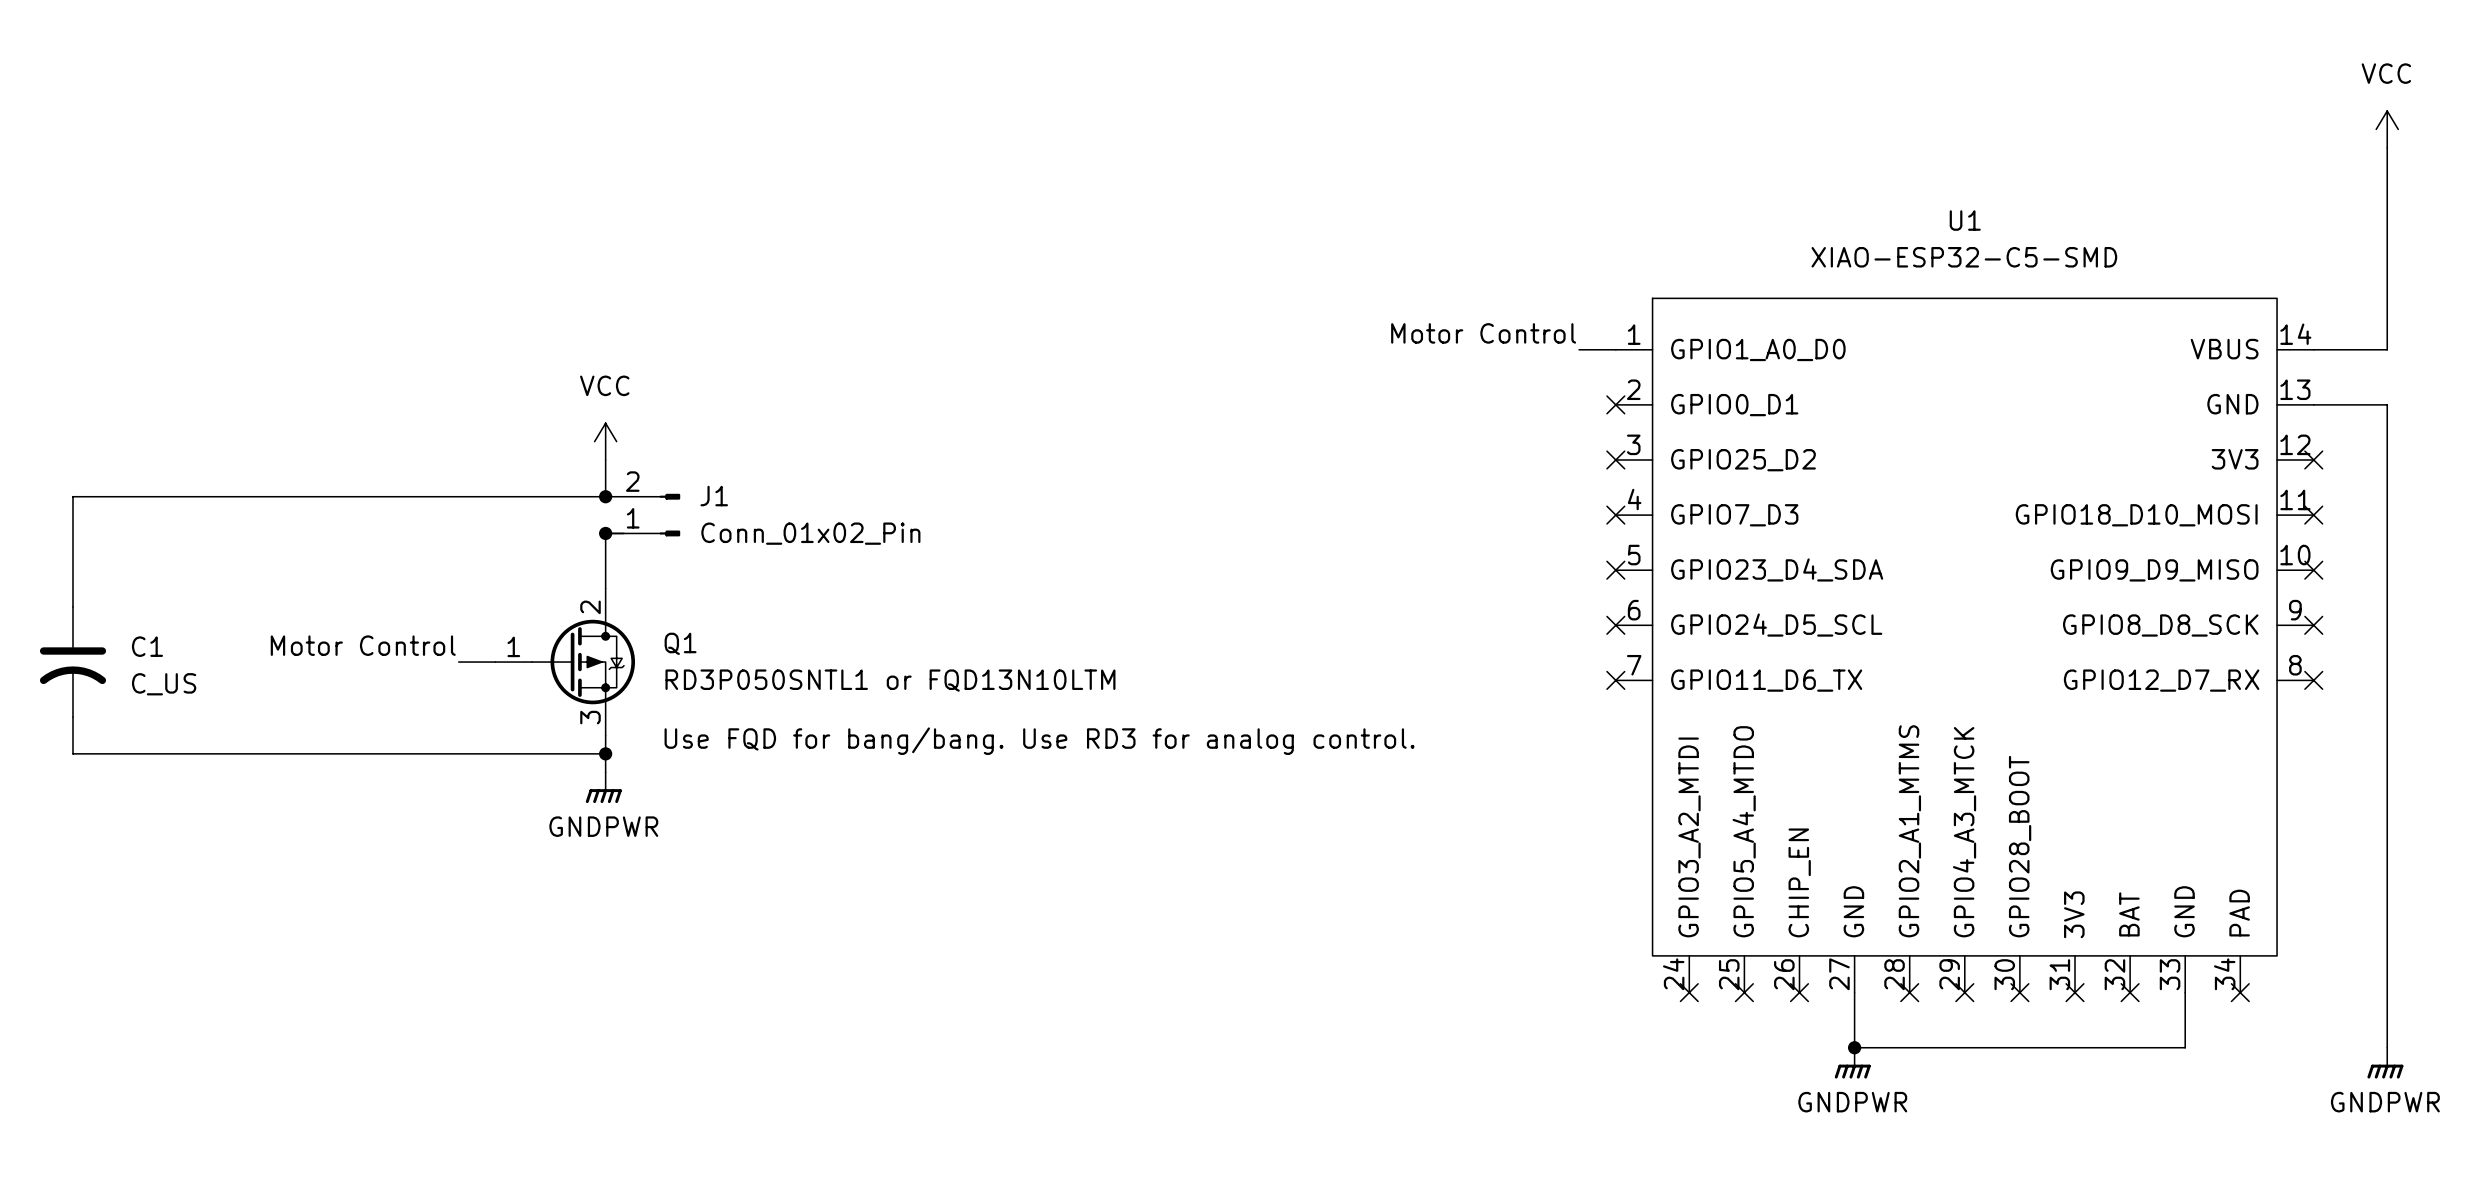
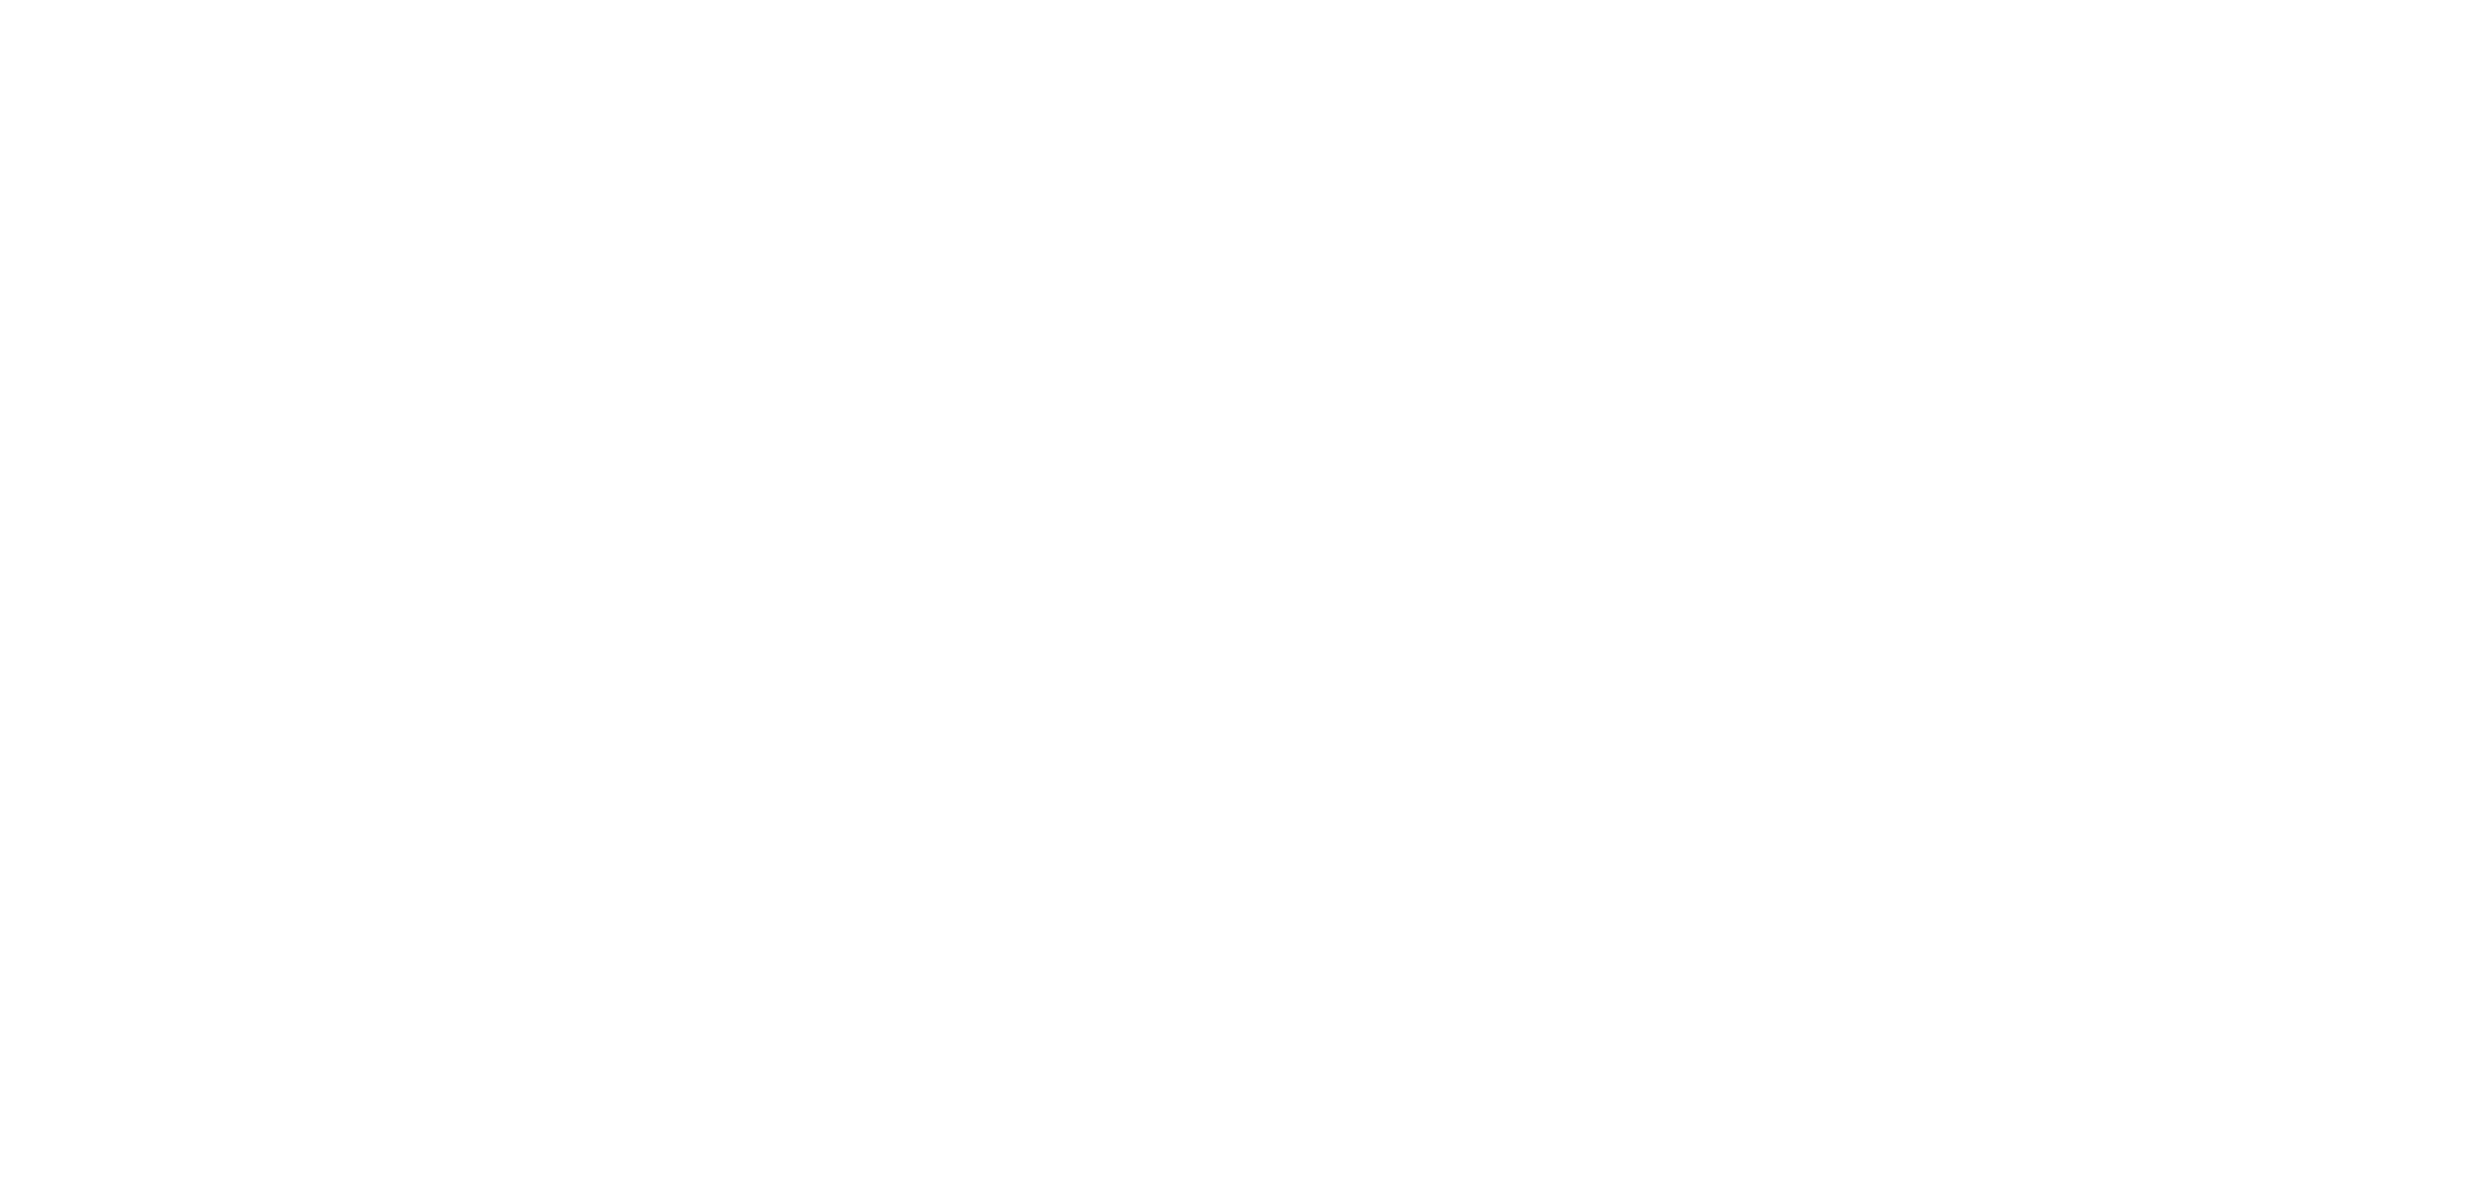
power symbol: VCC (2387, 129) -> none
wire: (2387, 147) (2387, 349) (2313, 349) -> none
label: Motor Control (1483, 333) -> none
wire: (1579, 349) (1615, 349) -> none
no-connect mark: (1615, 404) -> none
wire: (2313, 404) (2387, 404) (2387, 1047) -> none
power symbol: VCC (605, 441) -> none
wire: (605, 459) (605, 496) (73, 496) (73, 606) -> none
no-connect mark: (1615, 459) -> none
no-connect mark: (2313, 459) -> none
junction: (605, 496) -> none
J1: Conn_01x02_Pin (642, 515) -> none
no-connect mark: (1615, 515) -> none
no-connect mark: (2313, 515) -> none
junction: (605, 533) -> none
wire: (624, 533) (605, 533) (605, 588) -> none
no-connect mark: (1615, 570) -> none
no-connect mark: (2313, 570) -> none
no-connect mark: (1615, 625) -> none
no-connect mark: (2313, 625) -> none
label: Motor Control (363, 645) -> none
U1: XIAO-ESP32-C5-SMD (1964, 645) -> none
C1: C_US (73, 662) -> none
wire: (458, 662) (495, 662) -> none
Q1: RD3P050SNTL1 or FQD13N10LTM (565, 662) -> none
no-connect mark: (1615, 680) -> none
no-connect mark: (2313, 680) -> none
wire: (73, 717) (73, 753) (605, 753) -> none
wire: (605, 735) (605, 772) -> none
text: Use FQD for bang/bang. Use RD3 for analog control. (1039, 741) -> none
junction: (605, 753) -> none
power symbol: GNDPWR (603, 787) -> none
no-connect mark: (1689, 992) -> none
no-connect mark: (1744, 992) -> none
no-connect mark: (1799, 992) -> none
wire: (1854, 992) (1854, 1047) (2185, 1047) (2185, 992) -> none
no-connect mark: (1909, 992) -> none
no-connect mark: (1964, 992) -> none
no-connect mark: (2019, 992) -> none
no-connect mark: (2075, 992) -> none
no-connect mark: (2130, 992) -> none
no-connect mark: (2240, 992) -> none
junction: (1854, 1047) -> none
power symbol: GNDPWR (1852, 1063) -> none
power symbol: GNDPWR (2385, 1063) -> none

